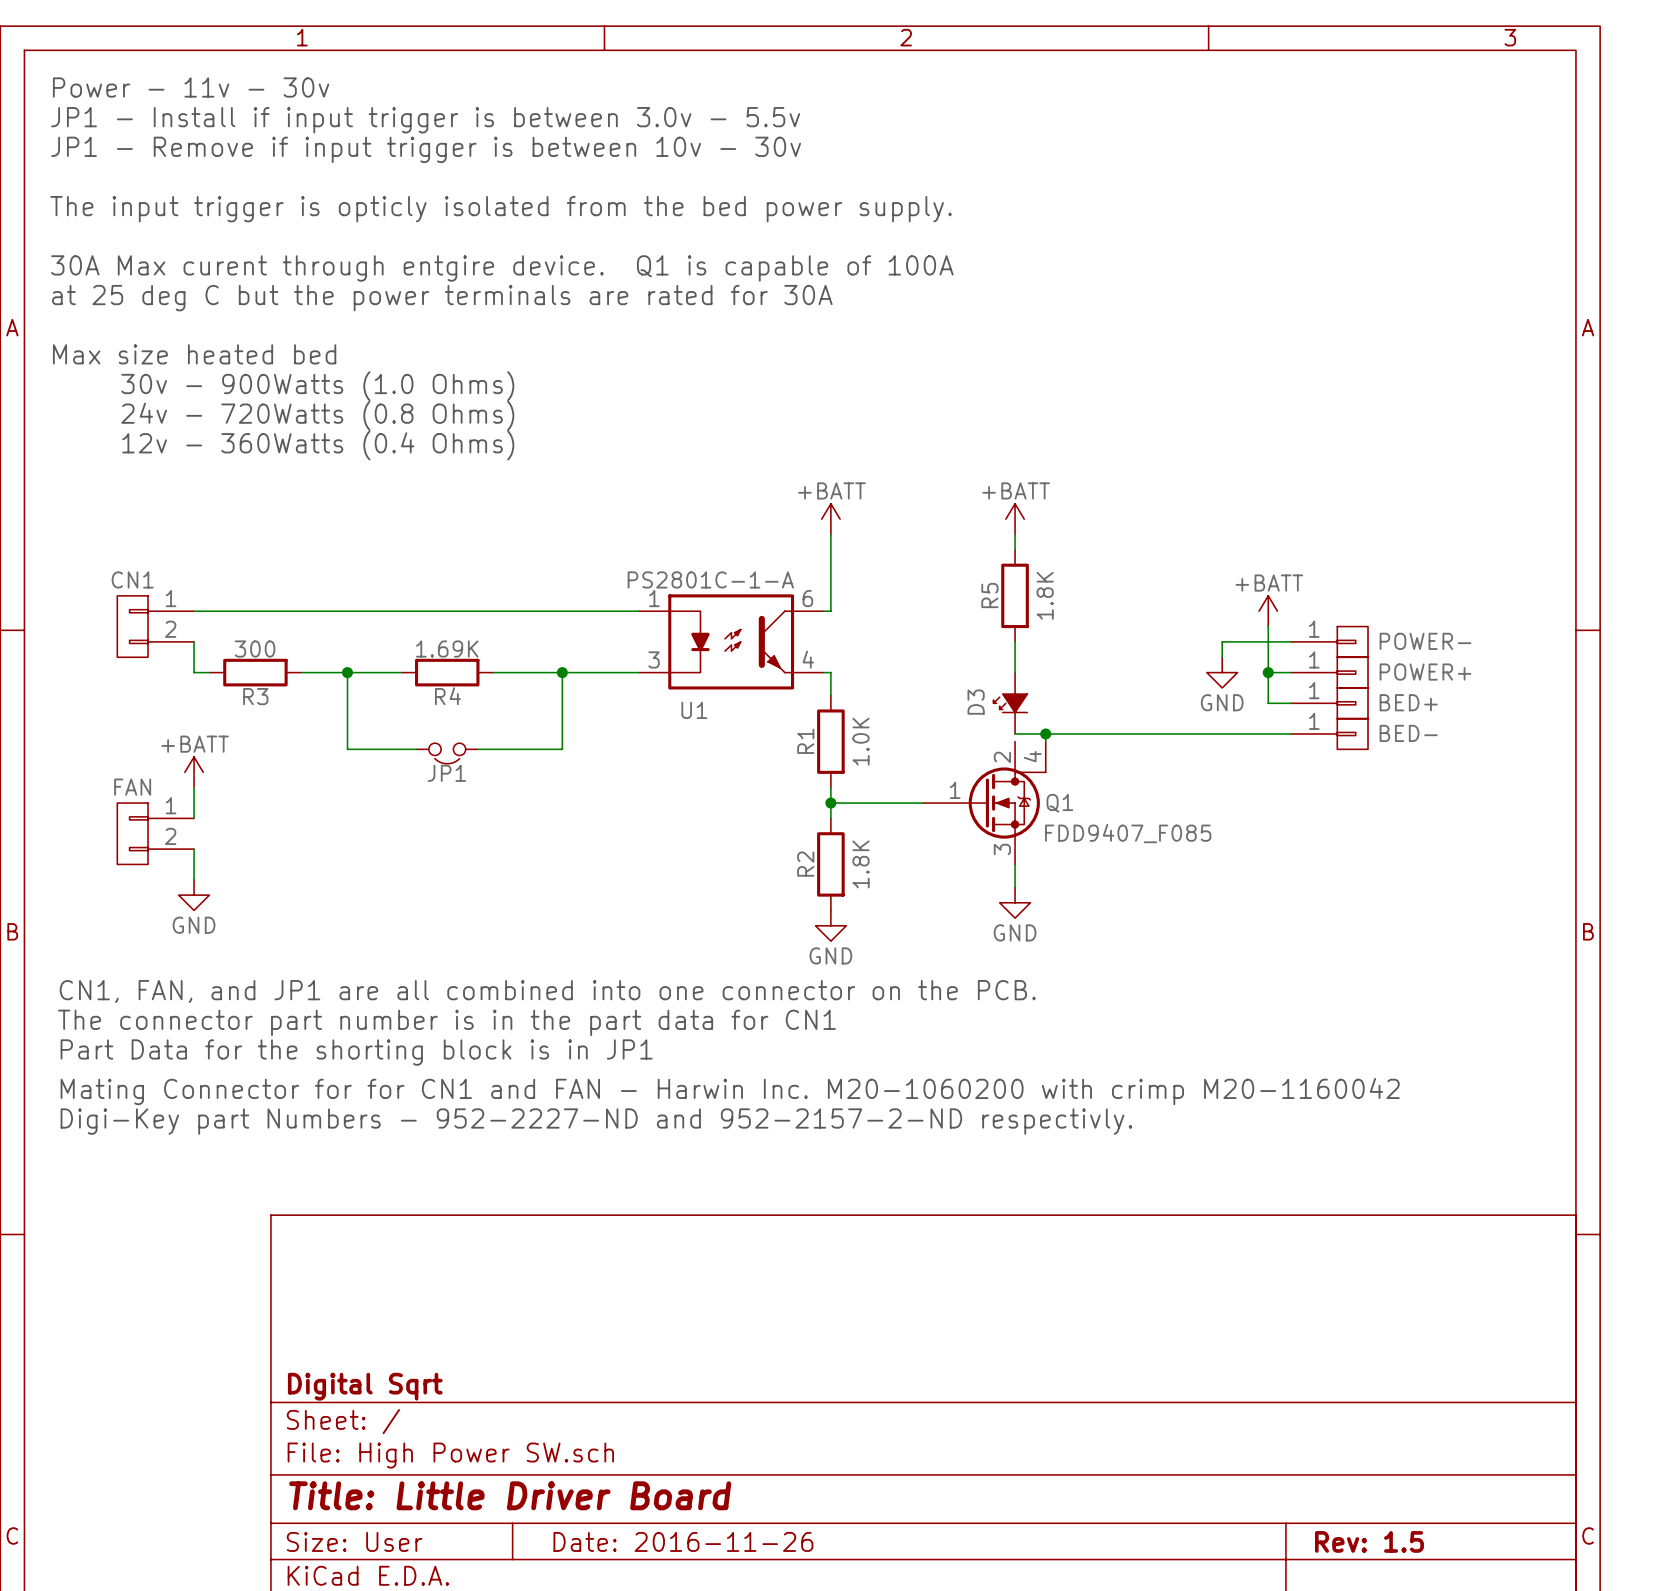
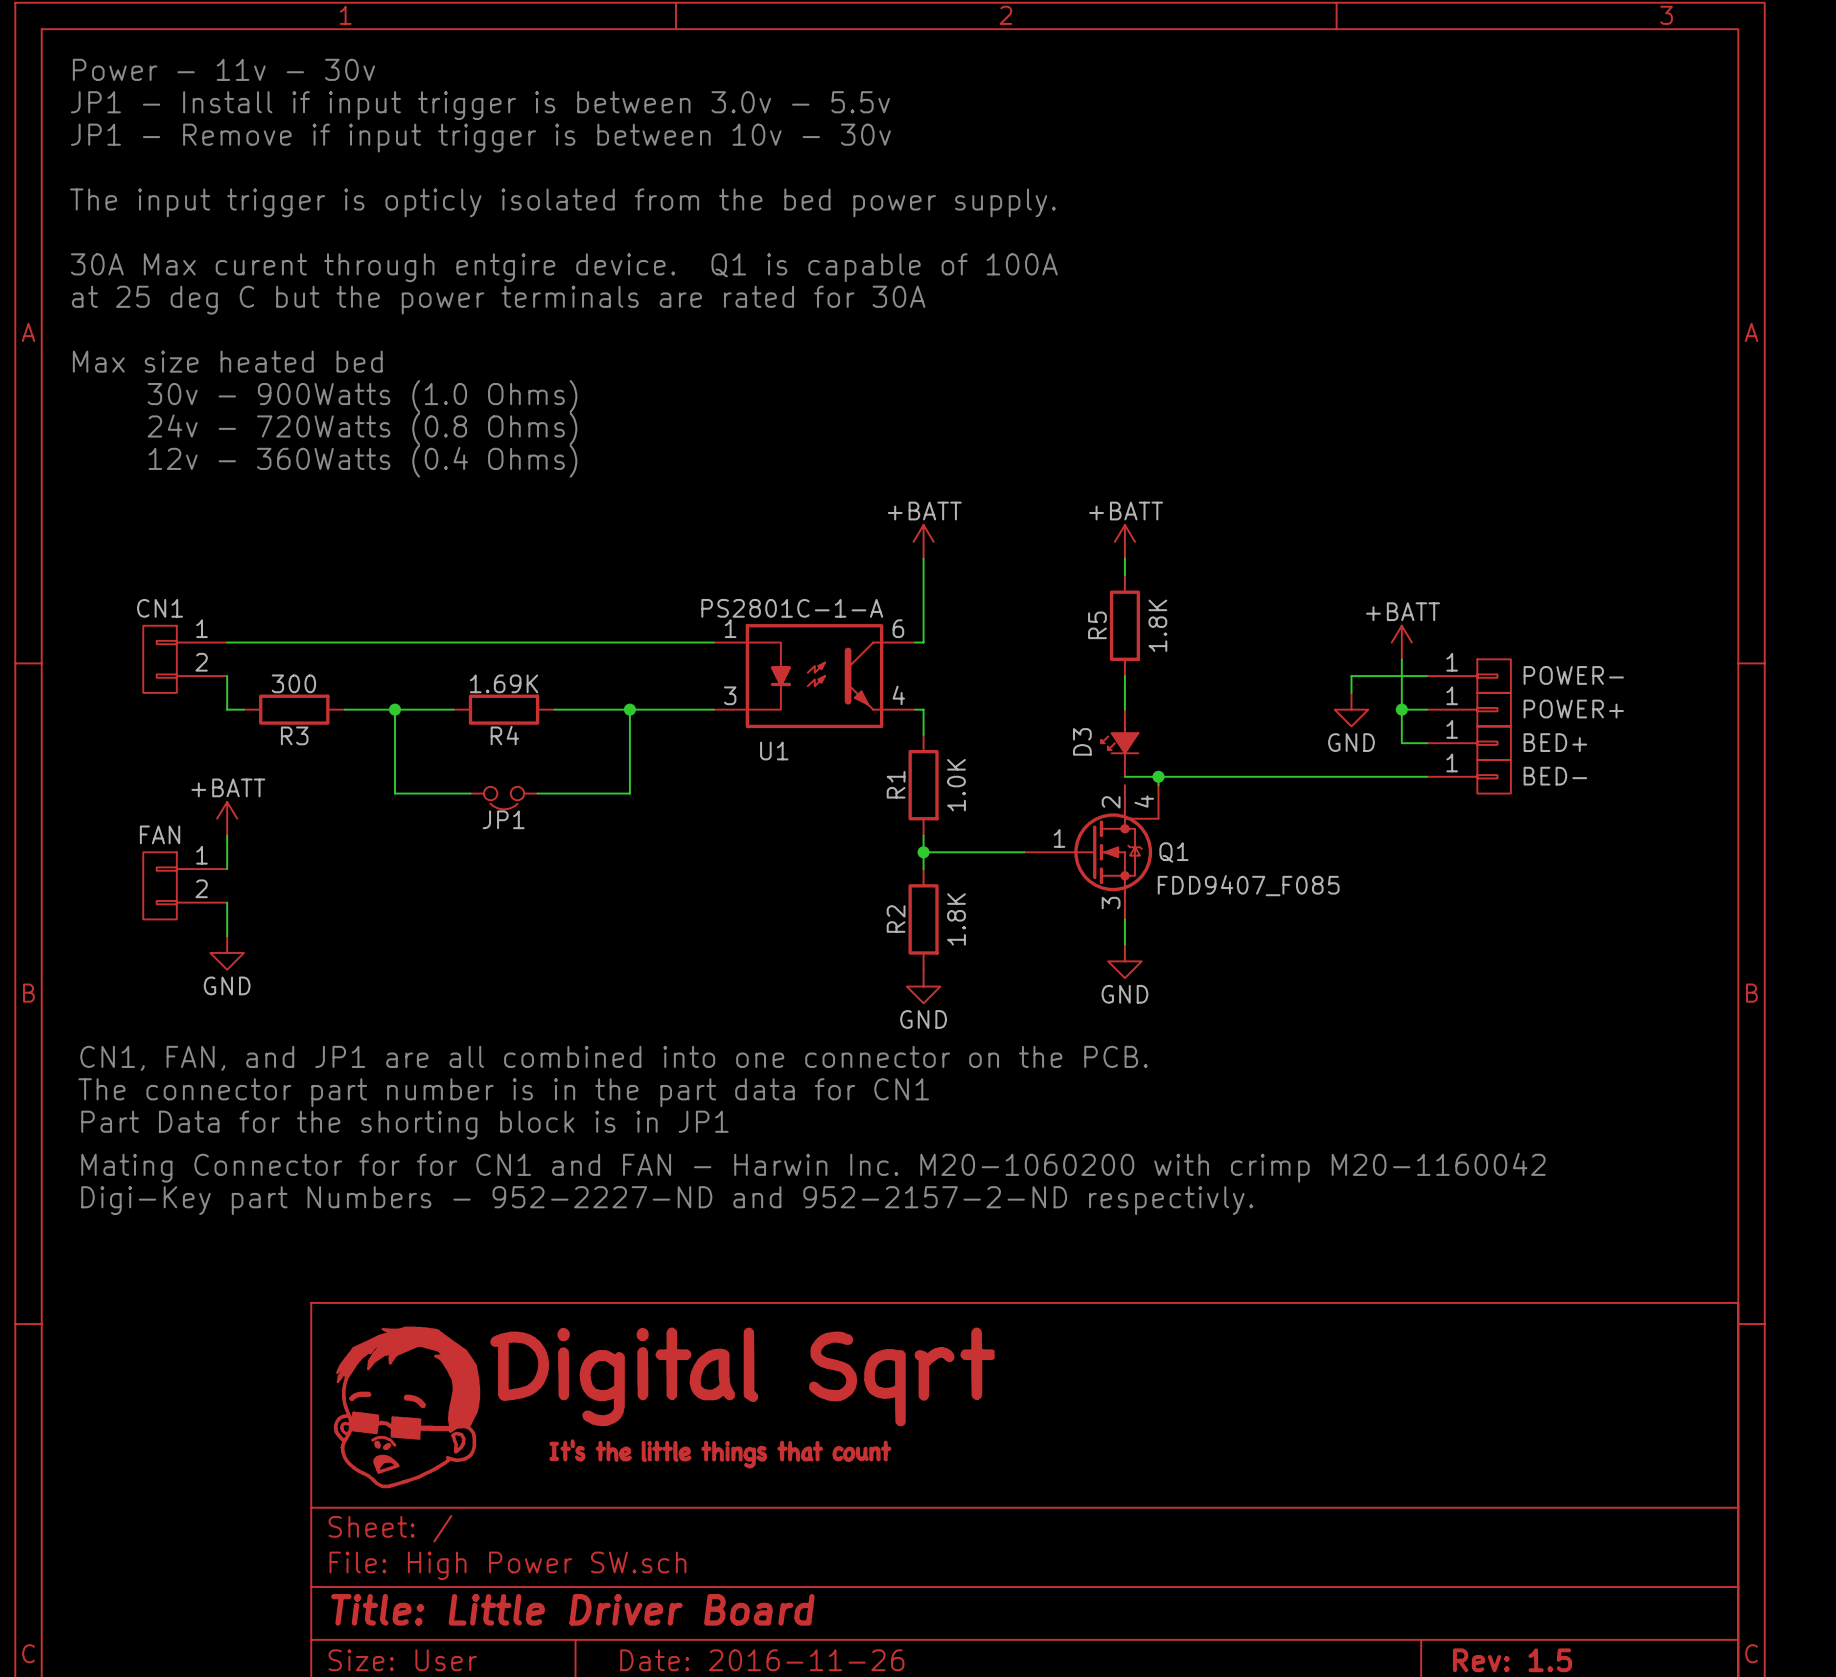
power symbol: none -> (664, 1407)
title block: Digital Sqrt (365, 1386) -> none

